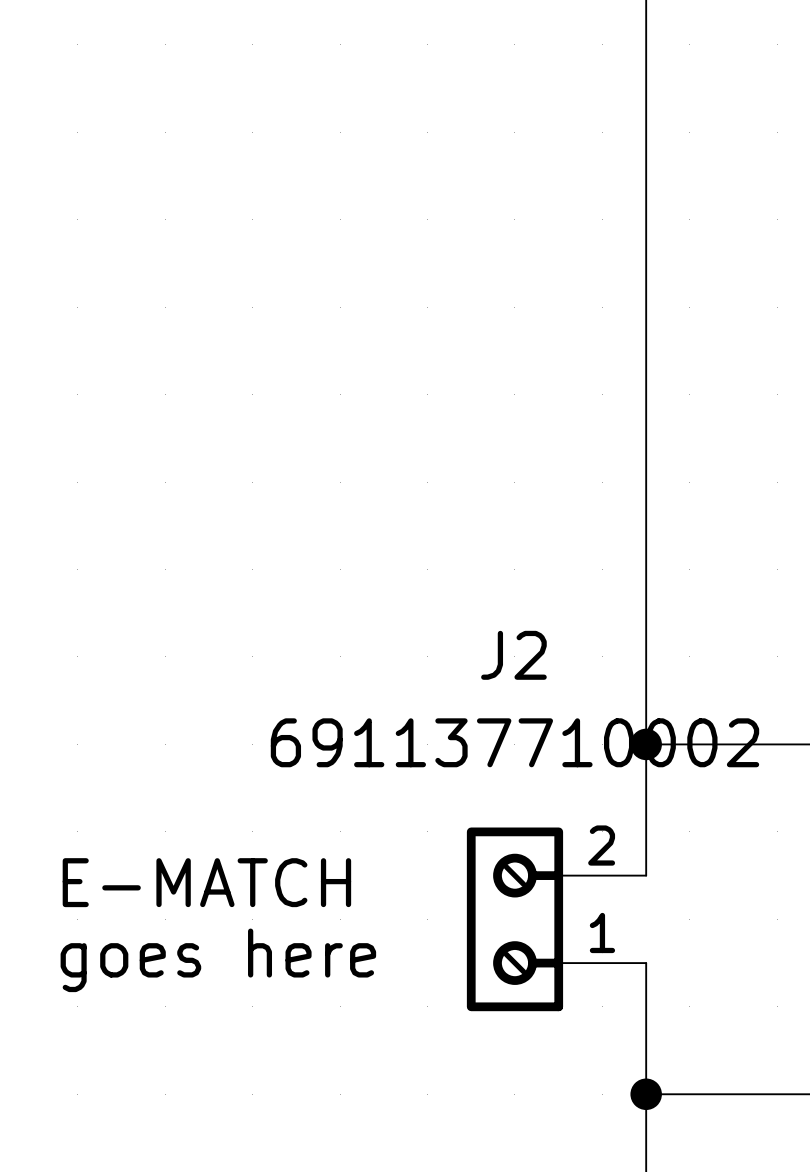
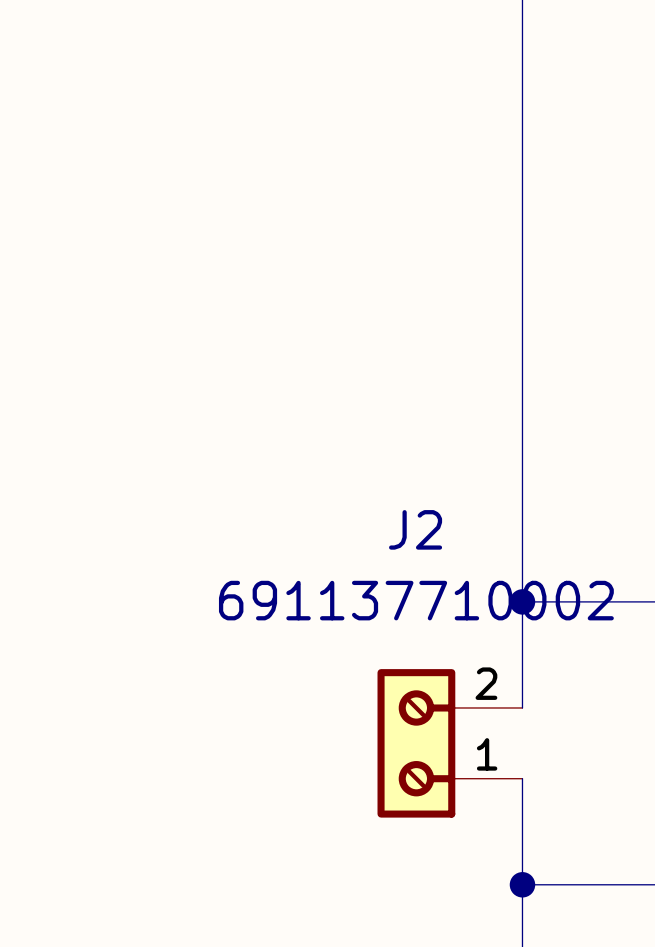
text: E-MATCH (206, 882) -> none
text: goes here (218, 960) -> none

